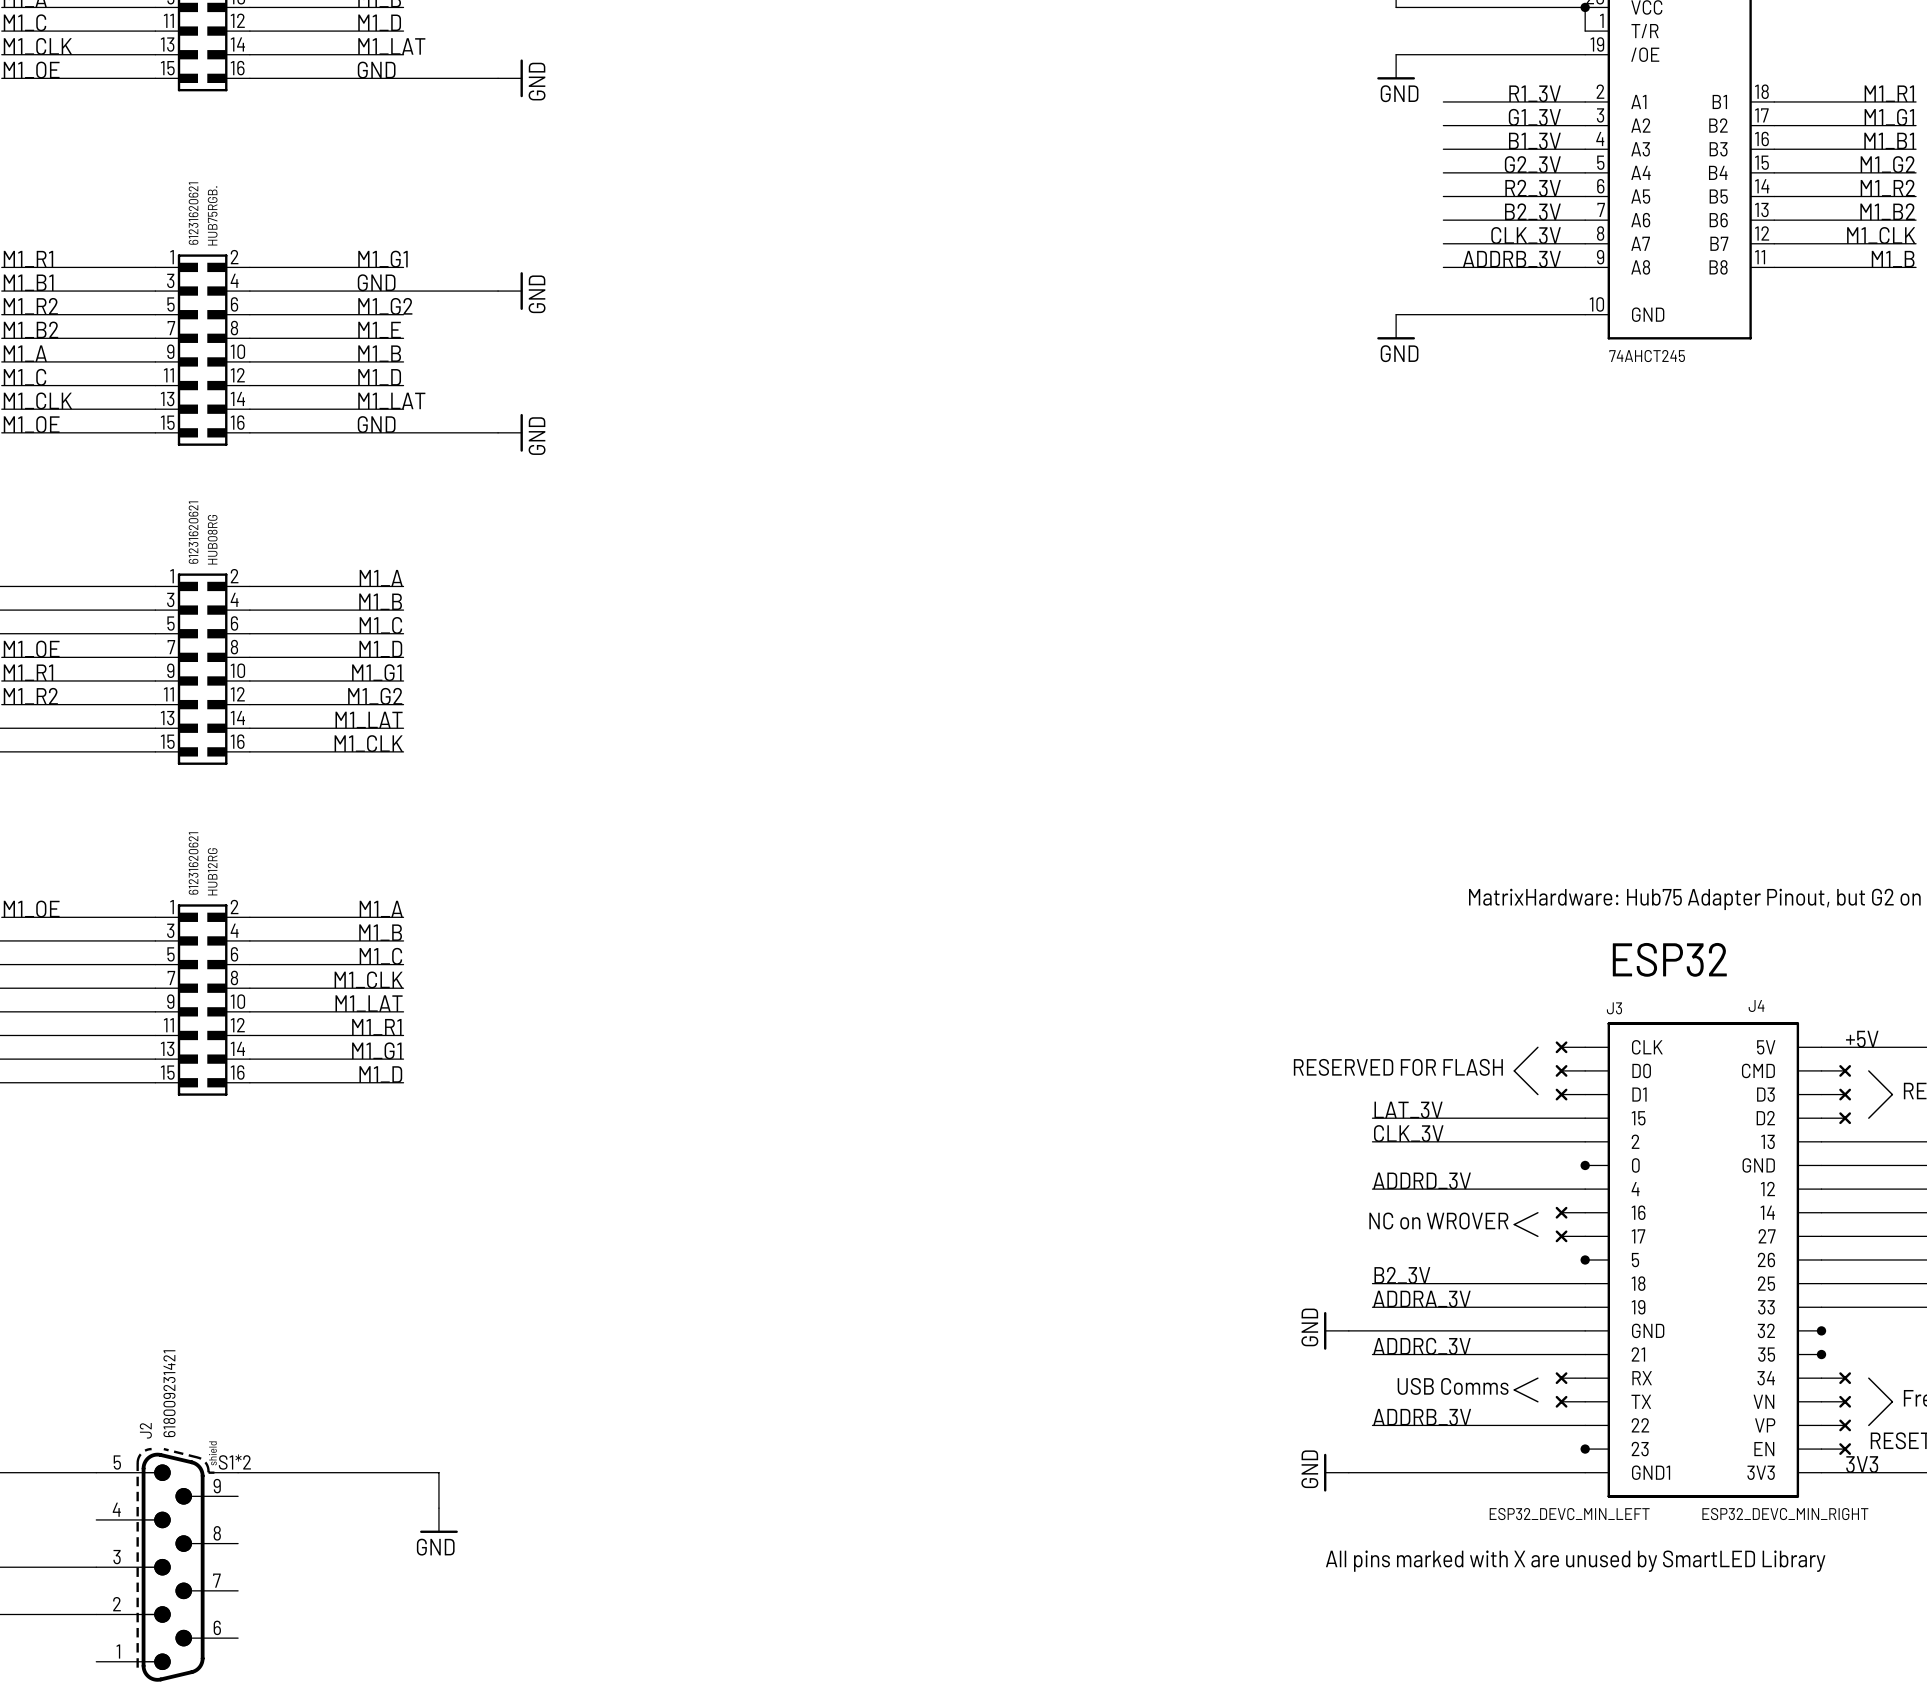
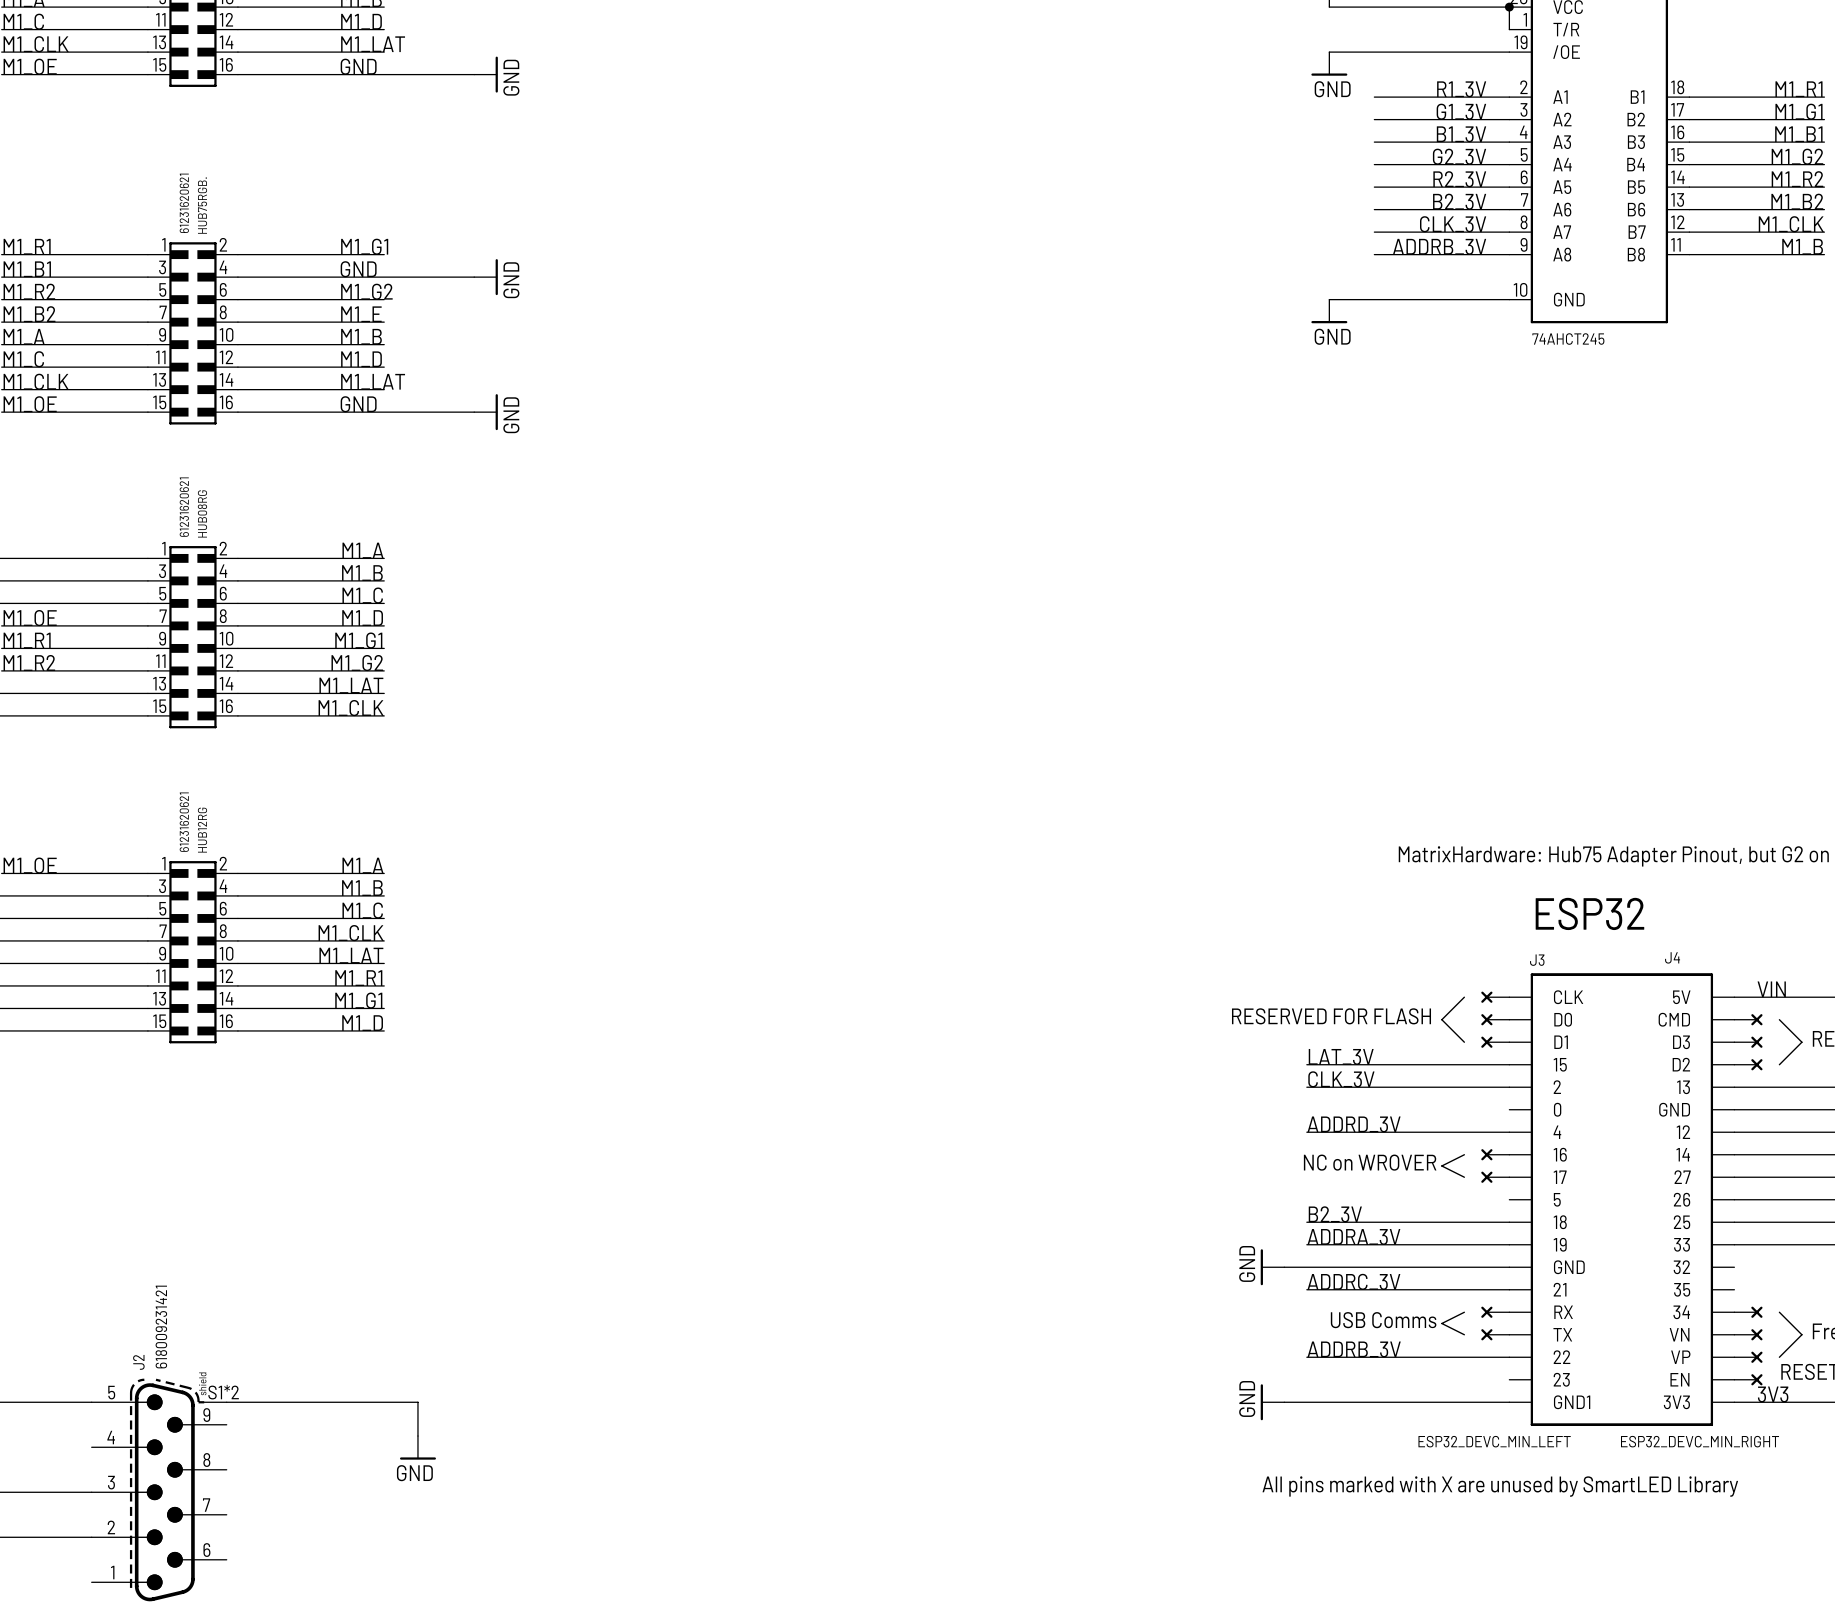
label: +5V (1862, 1039) -> VIN (1771, 989)
junction: (1585, 1165) -> none
junction: (1585, 1259) -> none
junction: (1821, 1330) -> none
junction: (1821, 1354) -> none
junction: (1585, 1449) -> none

